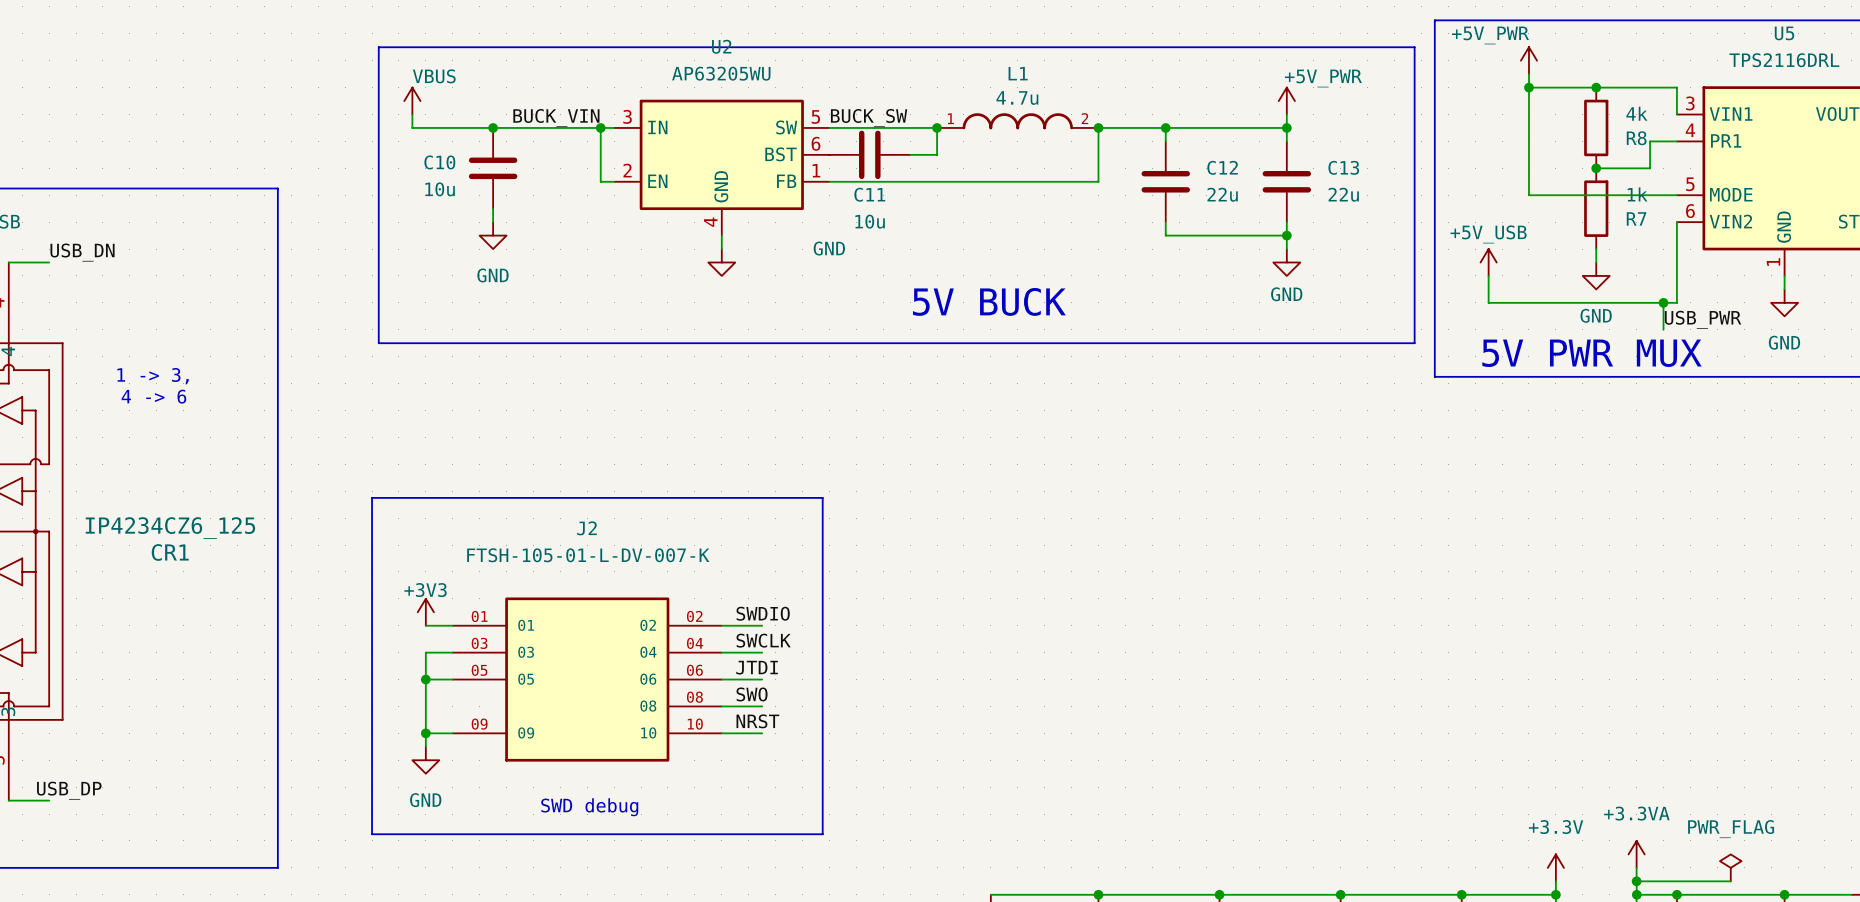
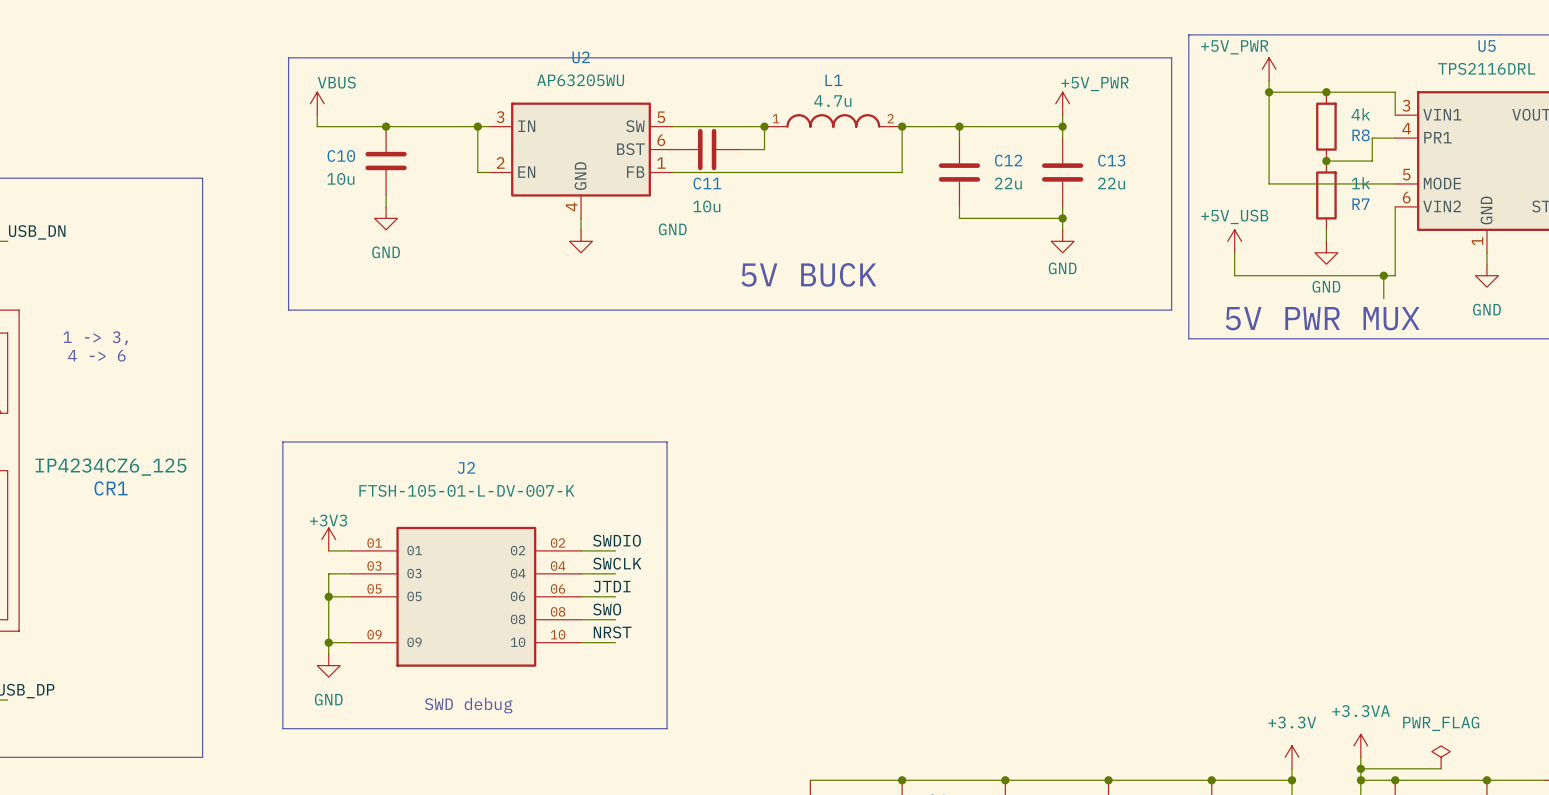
label: BUCK_VIN (556, 118) -> none
label: BUCK_SW (869, 118) -> none
label: USB_PWR (1703, 319) -> none

